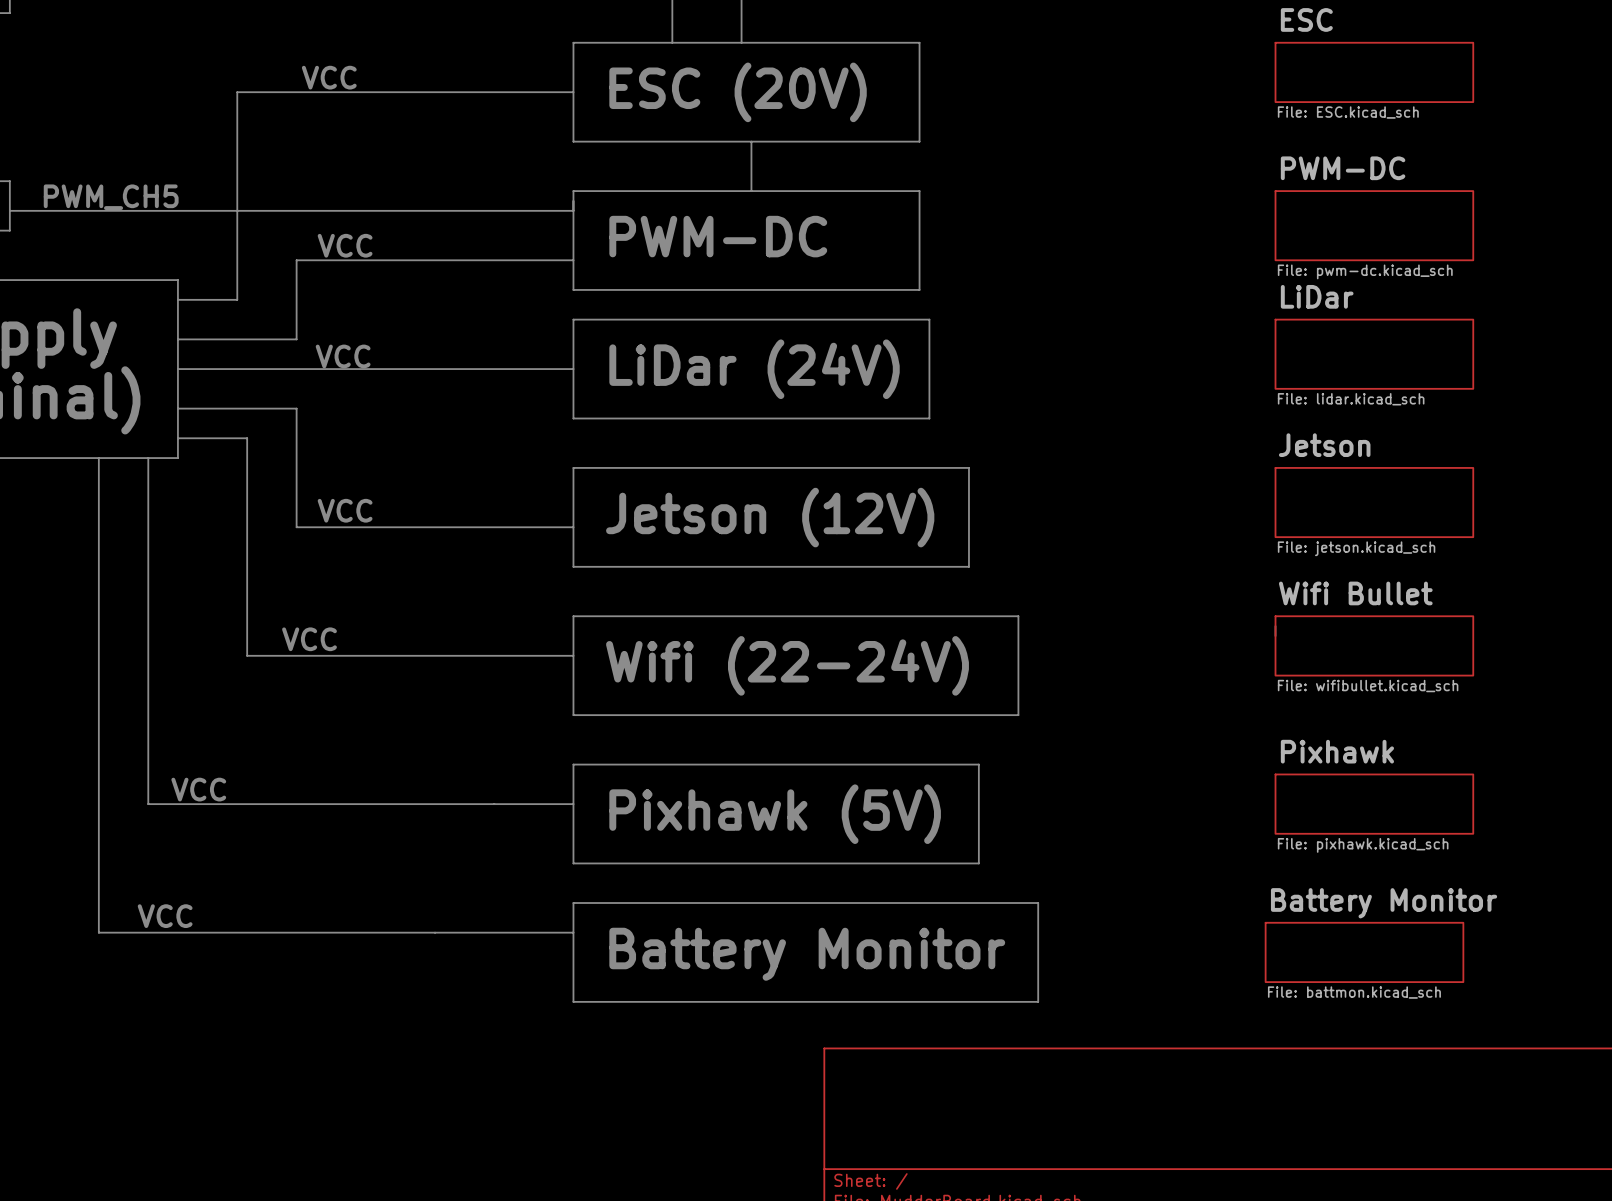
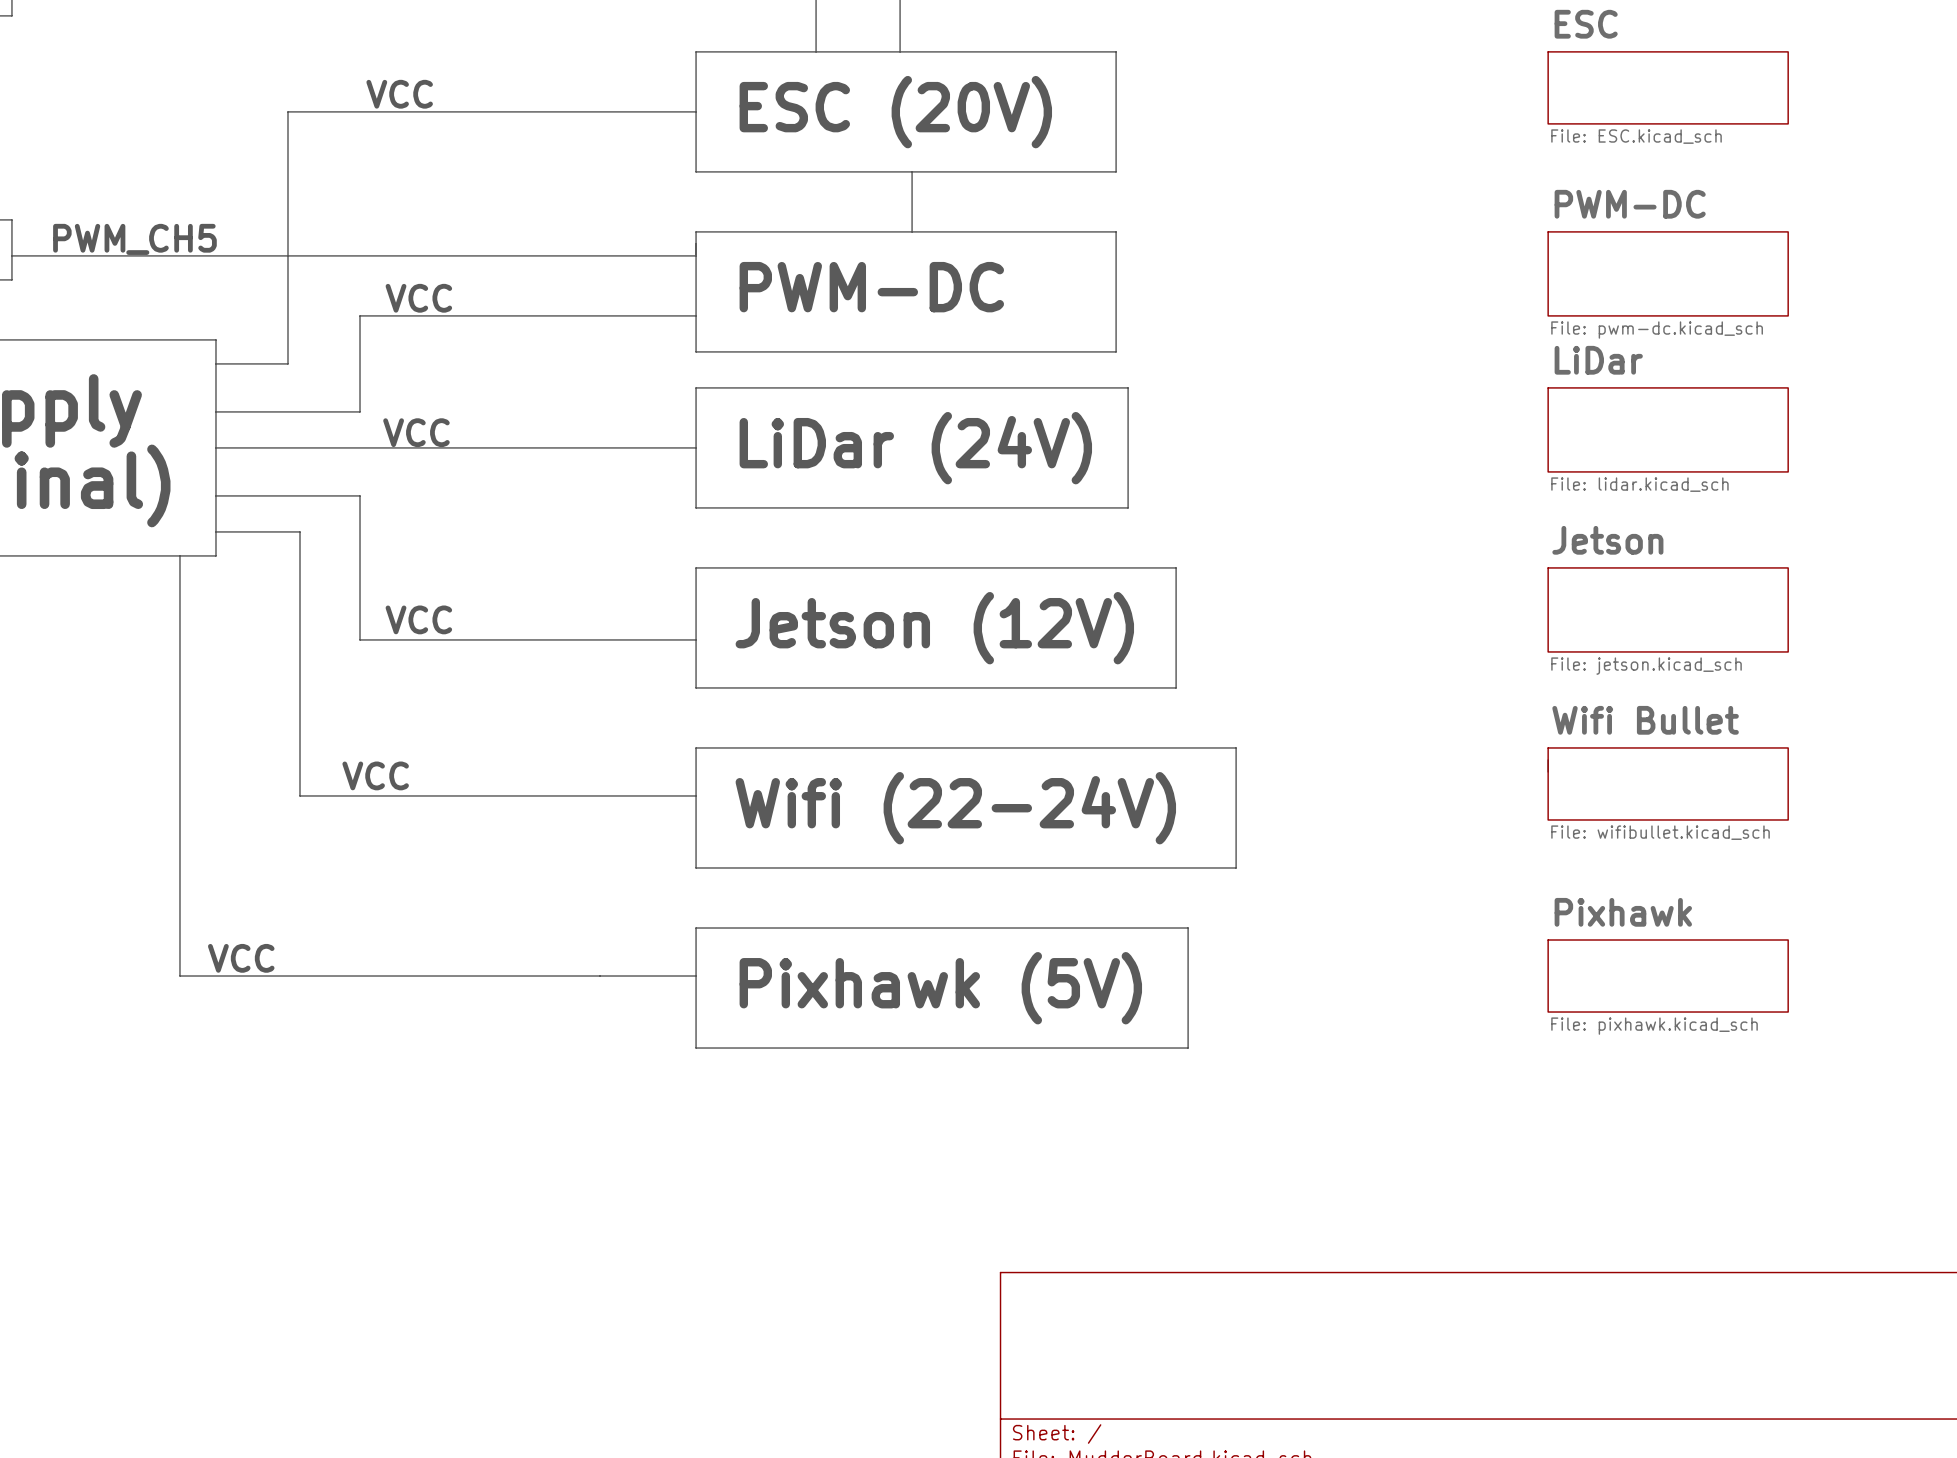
line: (98, 458) (98, 932) (573, 932) -> none
line: (573, 903) (573, 1001) (1038, 1001) (1038, 903) (573, 903) -> none
text: VCC (165, 916) -> none
sheet Battery Monitor: File: battmon.kicad_sch (1364, 952) -> none
text: Battery Monitor (807, 954) -> none

